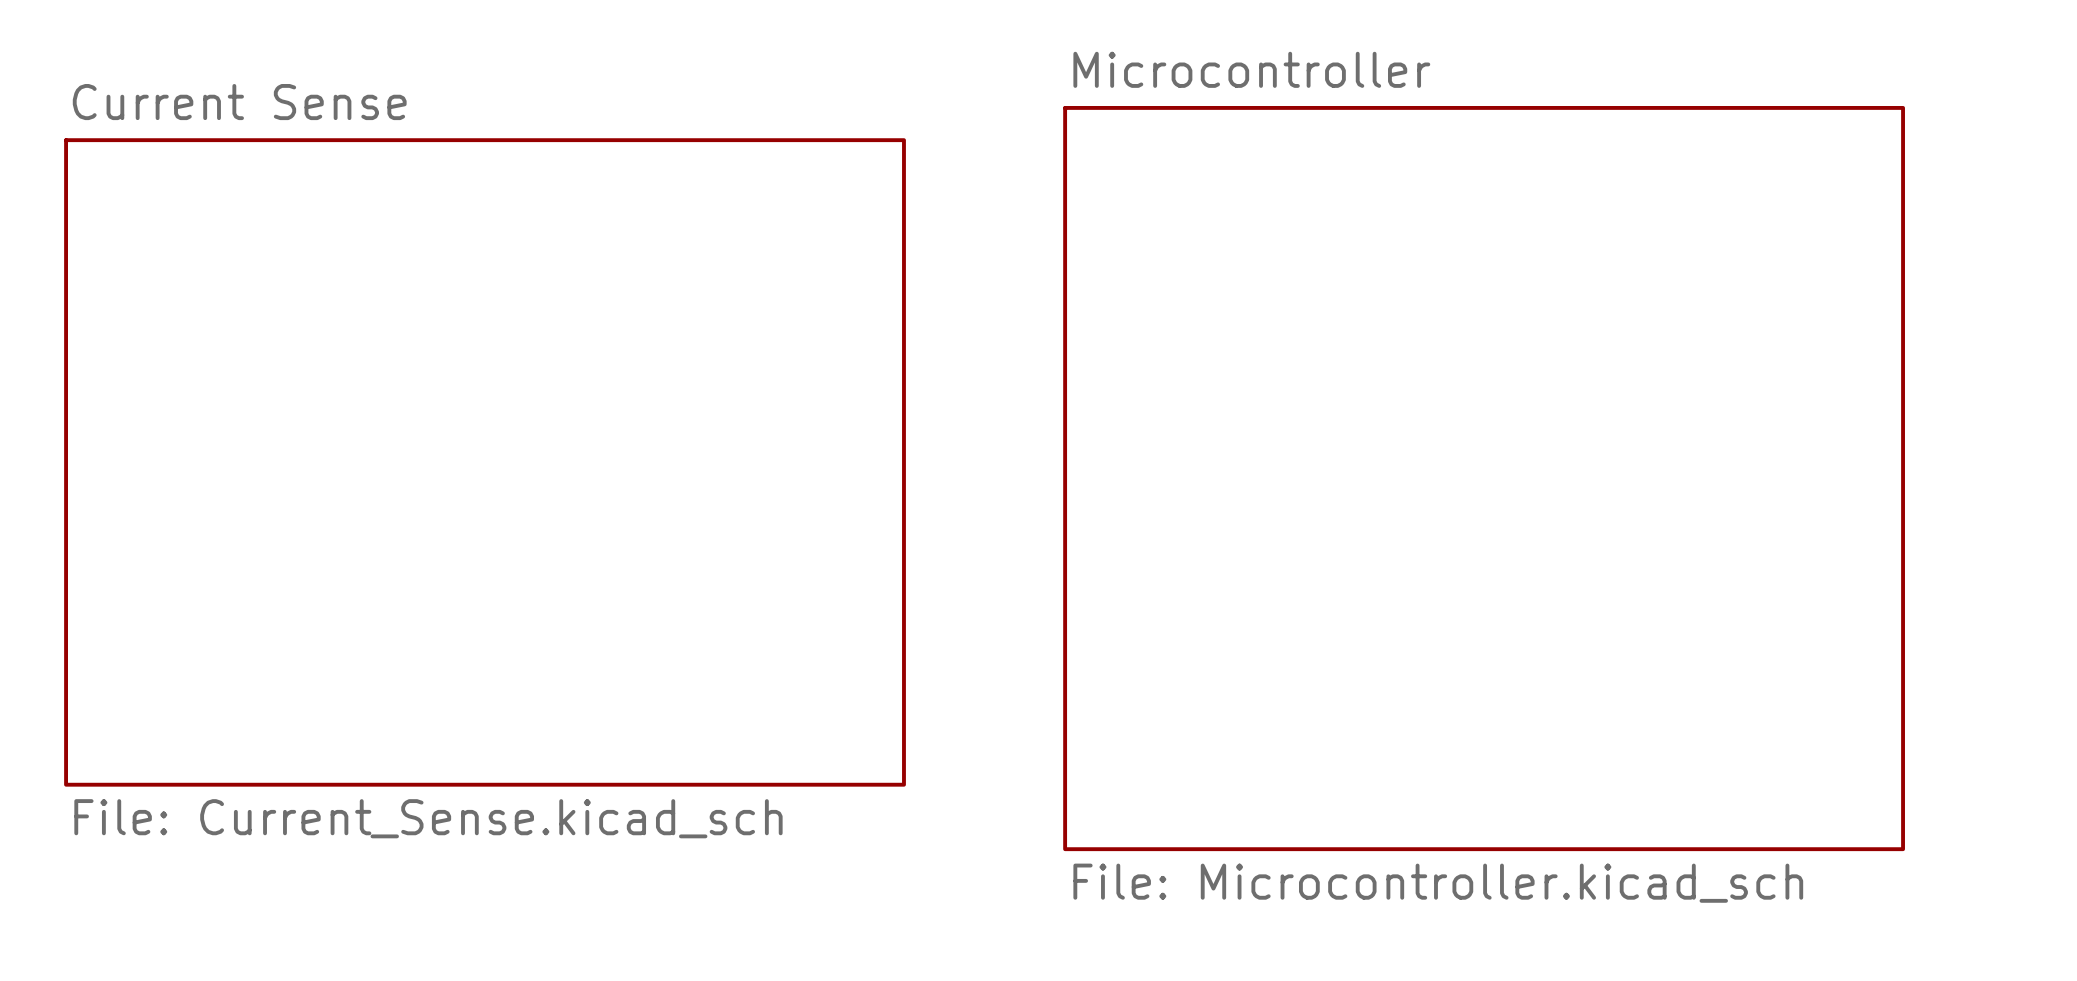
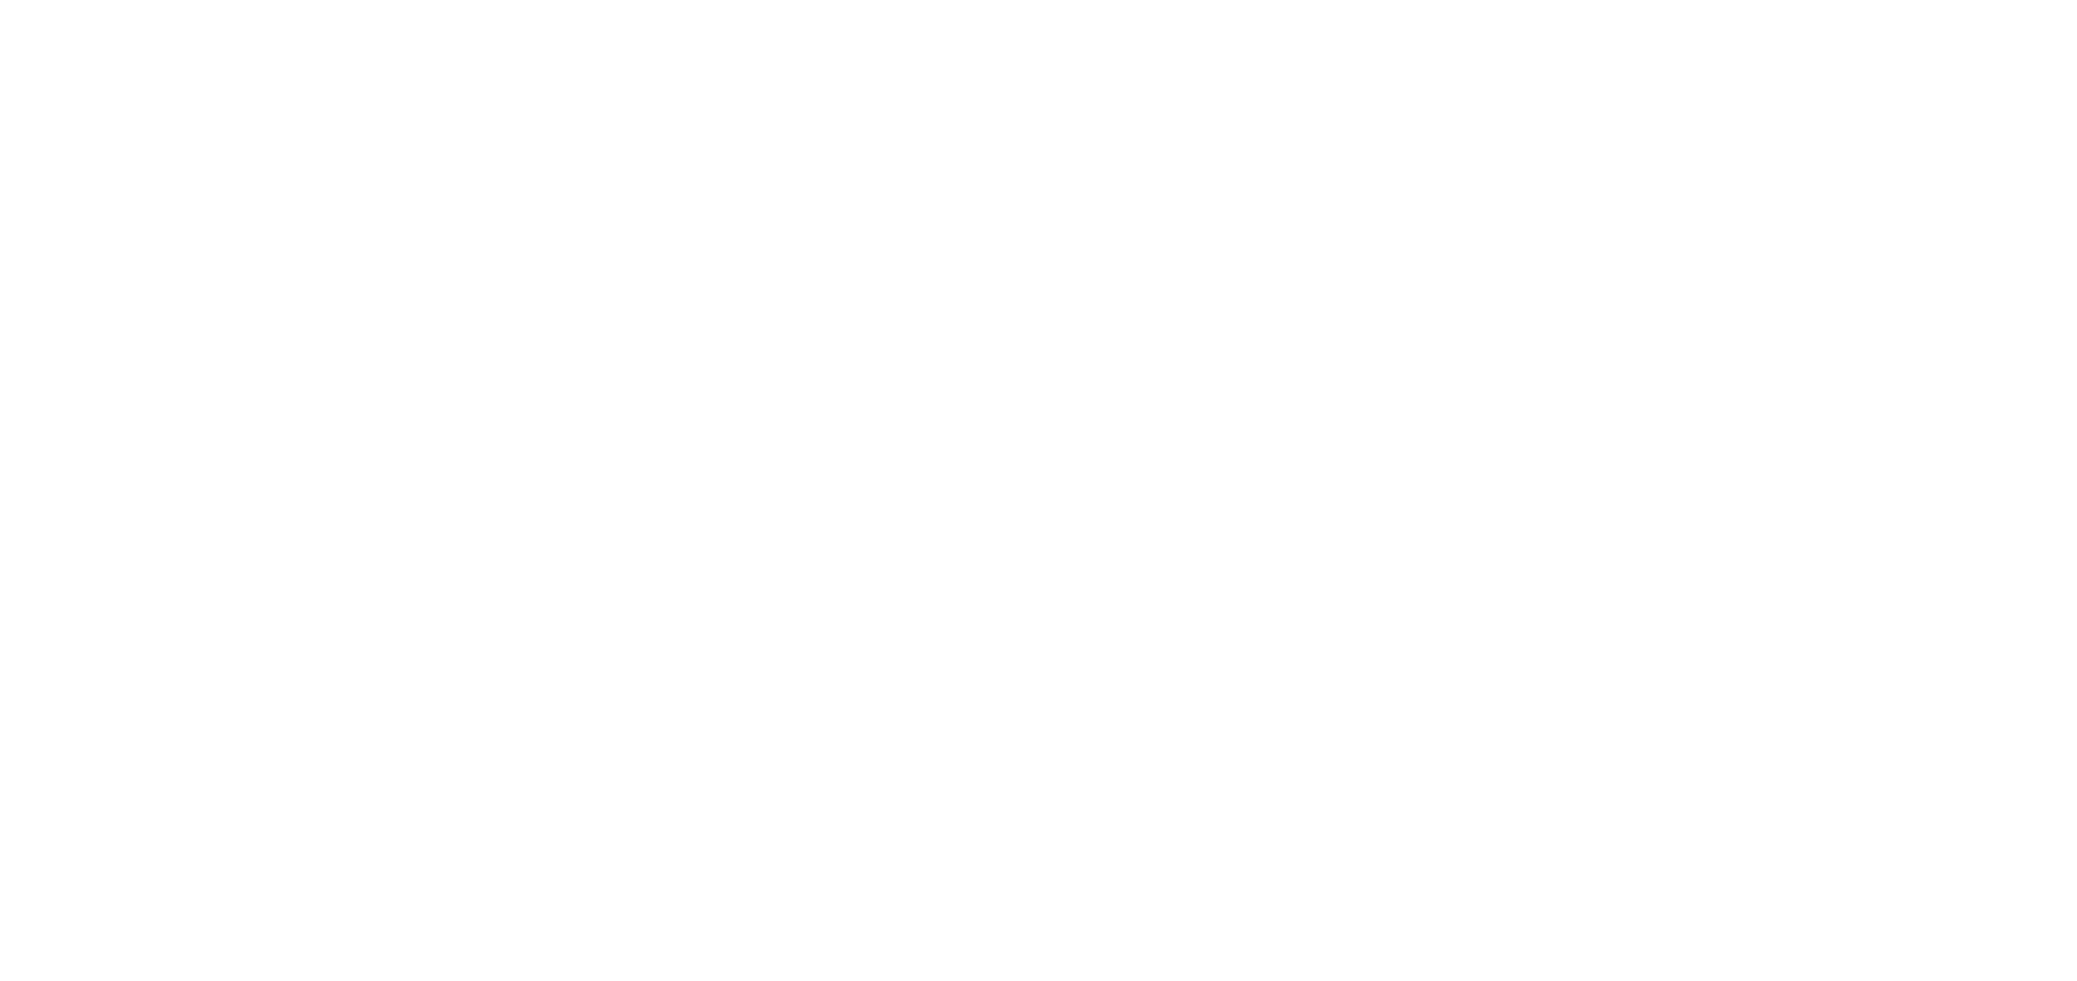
sheet Current Sense: File: Current_Sense.kicad_sch (485, 462) -> none
sheet Microcontroller: File: Microcontroller.kicad_sch (1484, 478) -> none

